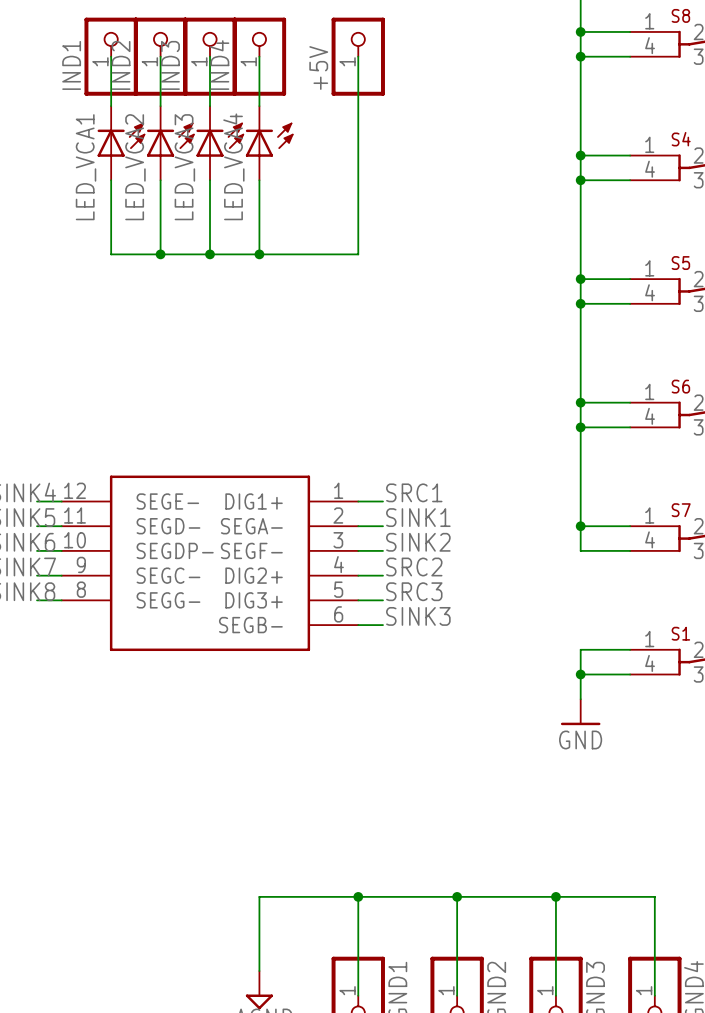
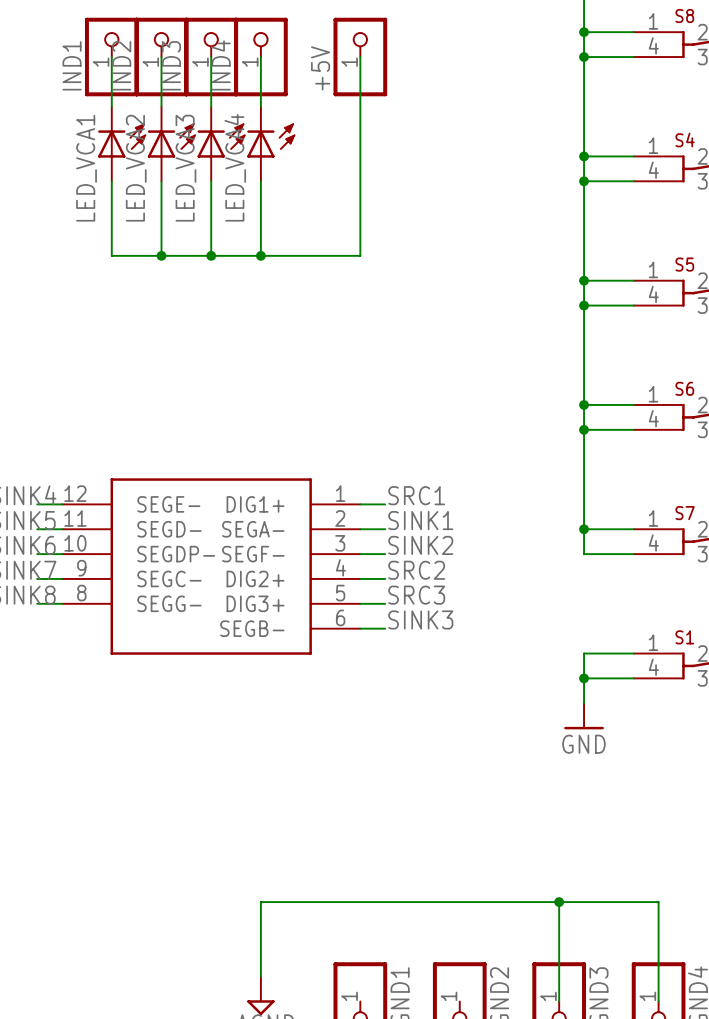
wire: (358, 896) (358, 995) -> none
junction: (358, 896) -> none
wire: (457, 896) (457, 995) -> none
junction: (457, 896) -> none

